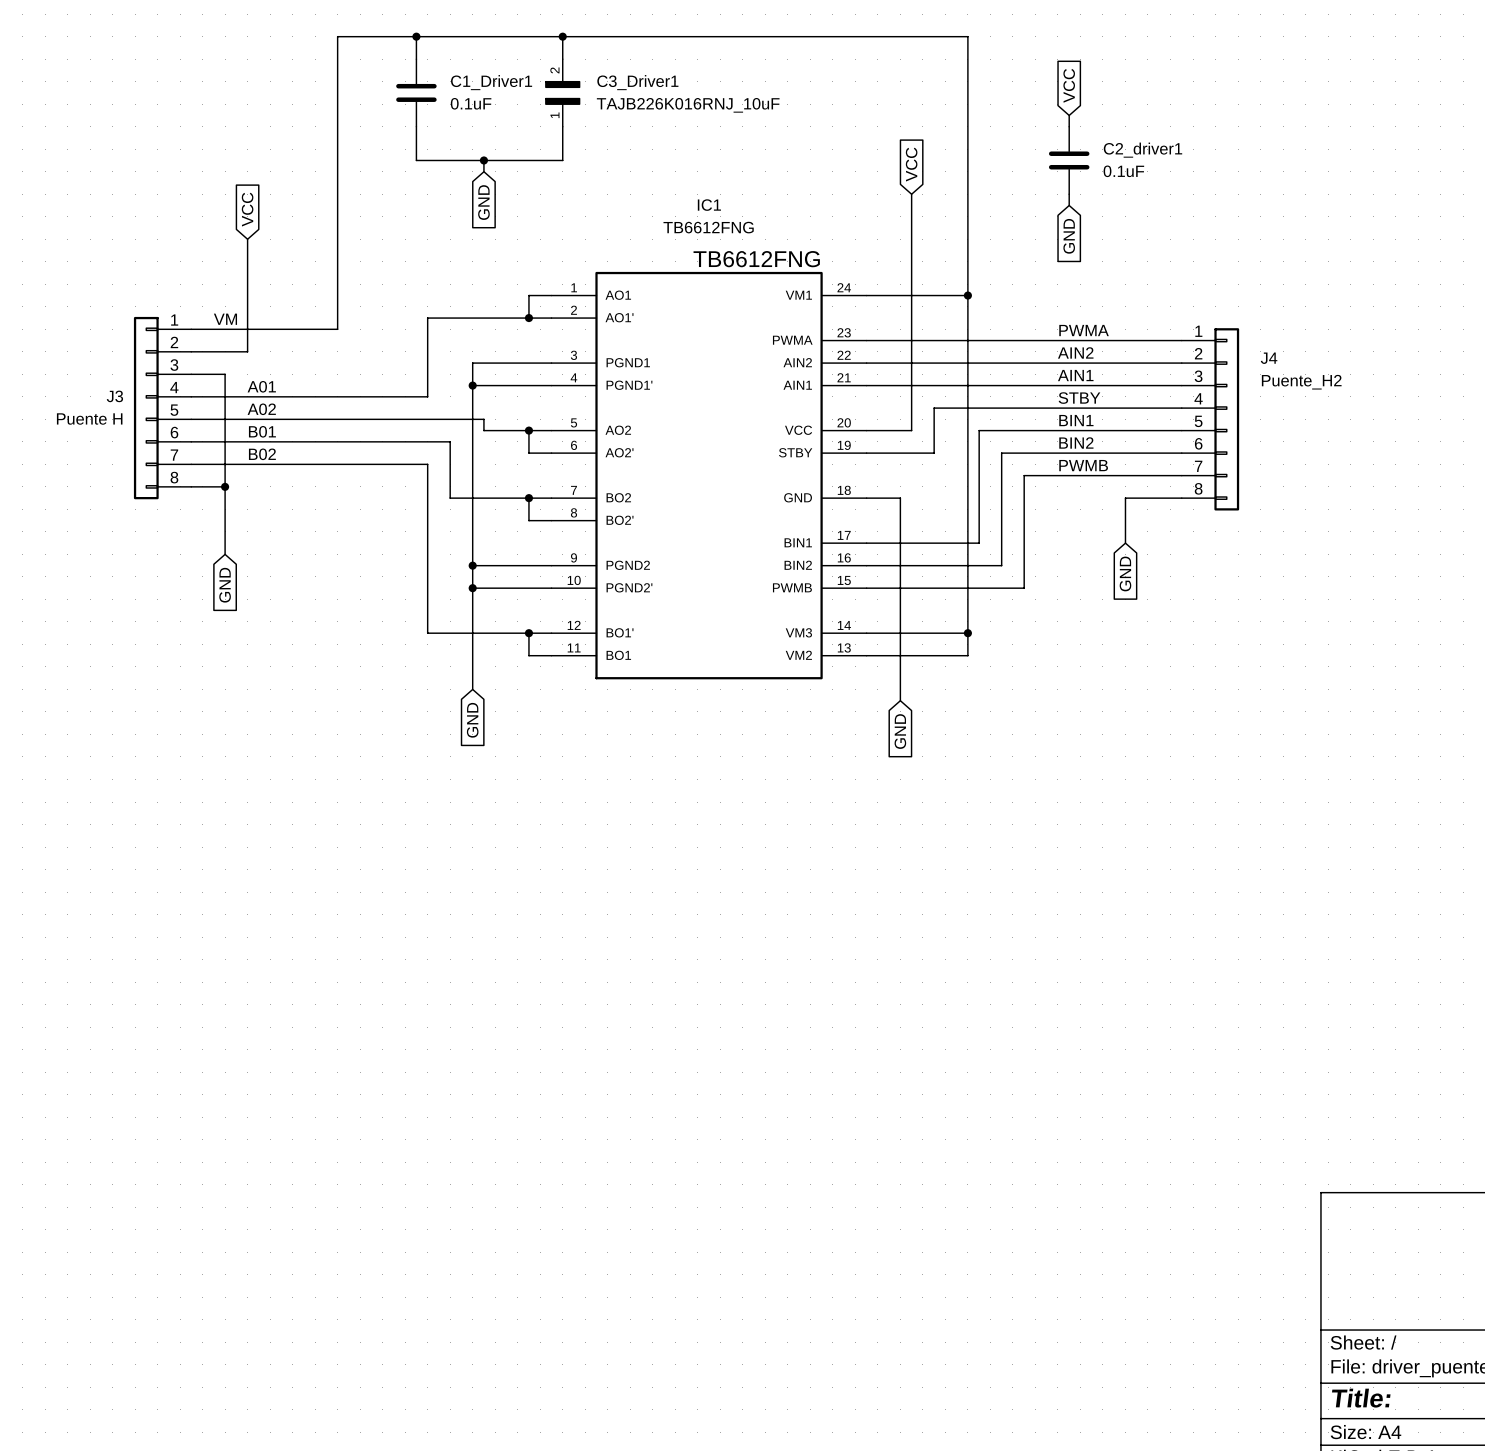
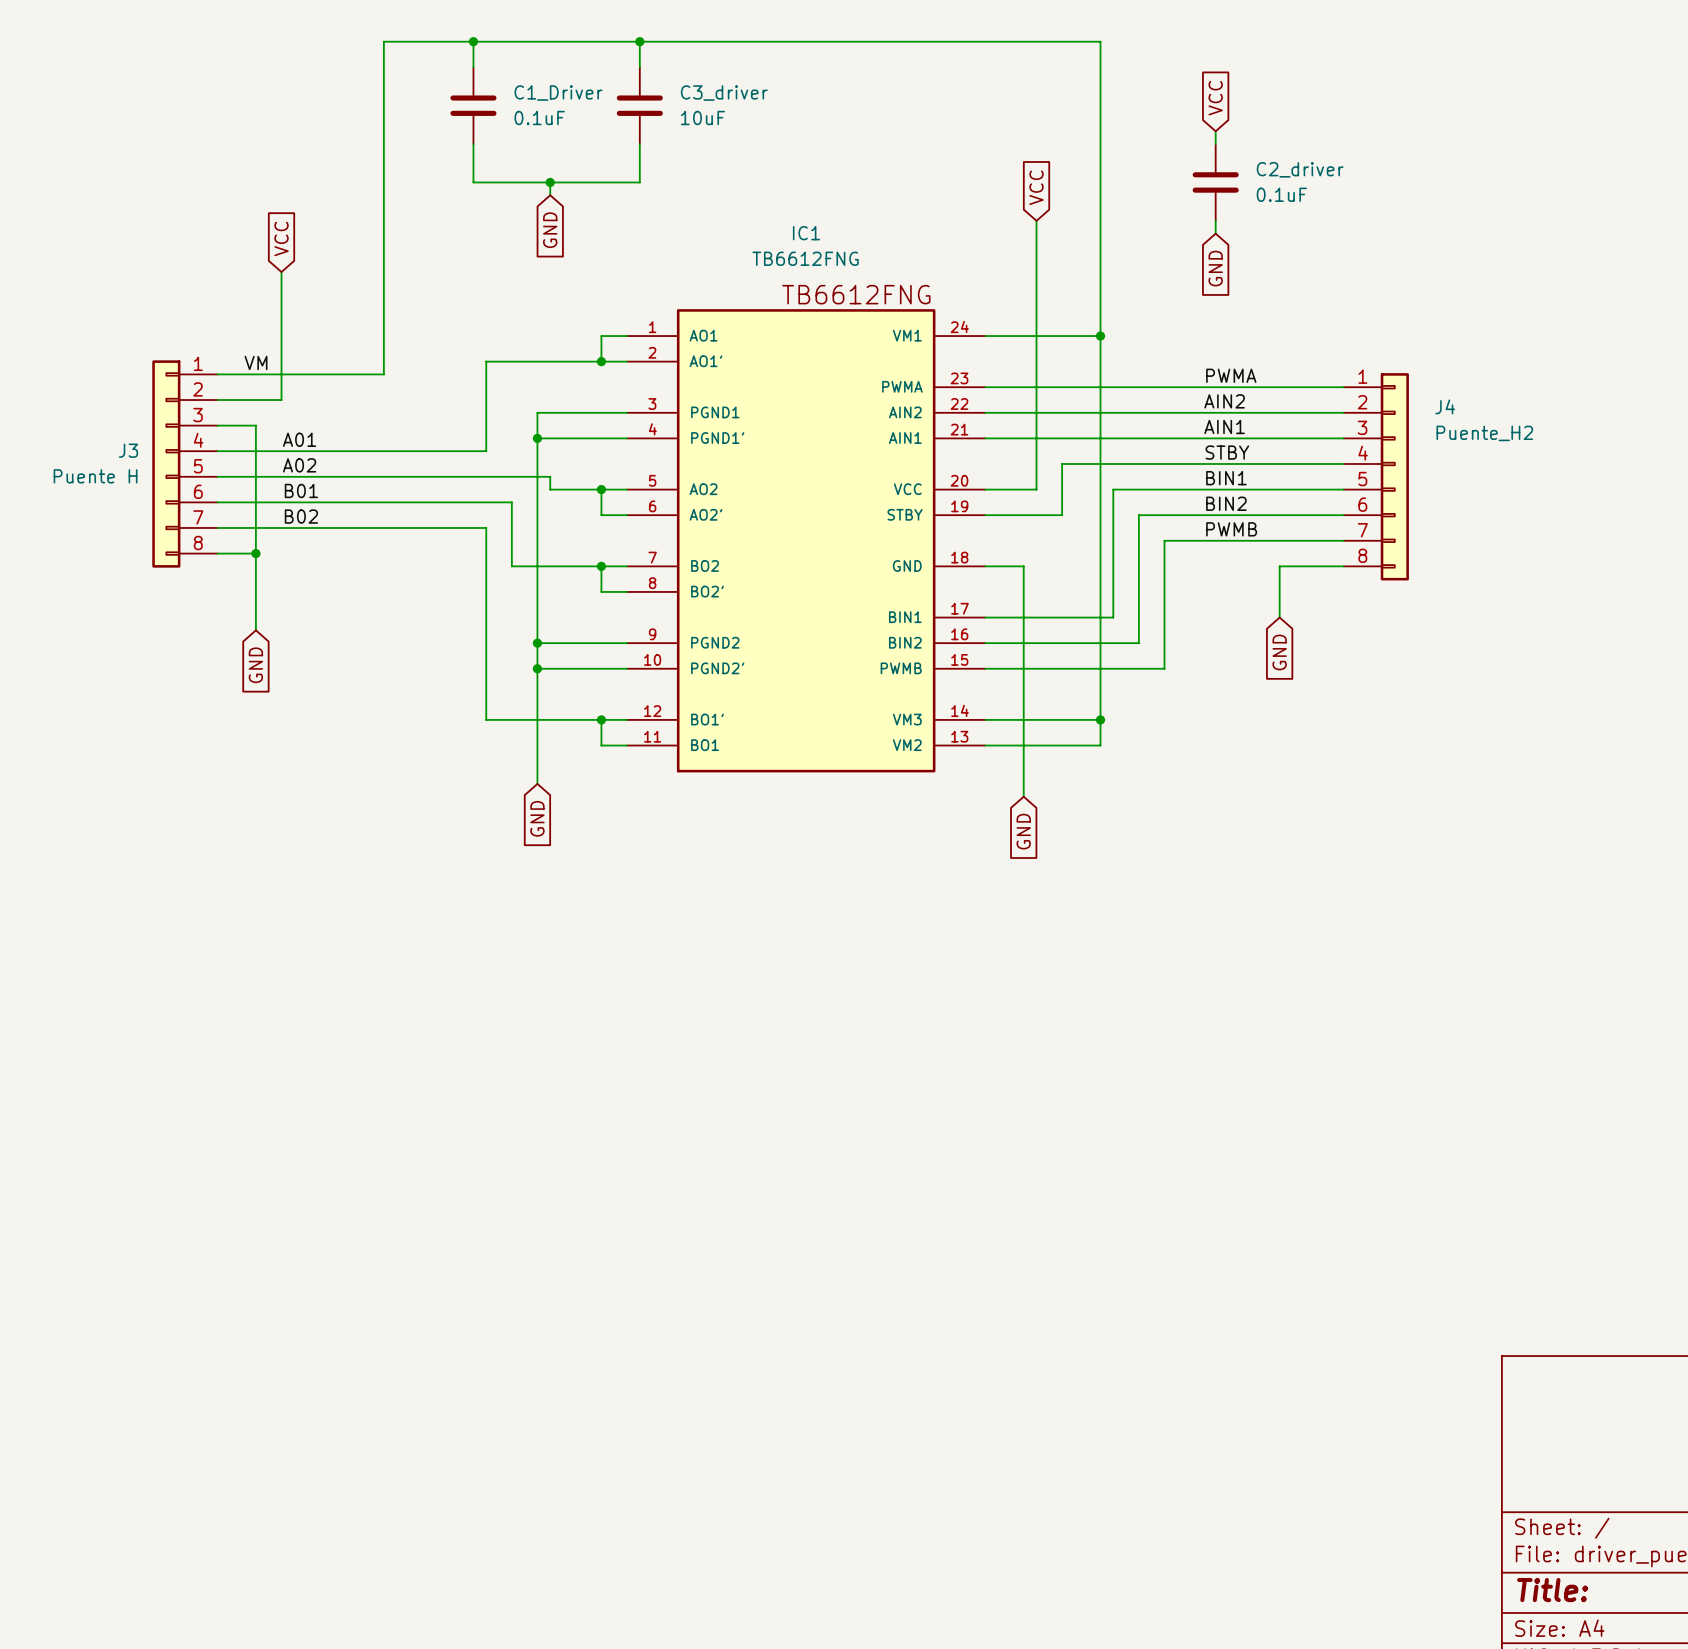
C1_Driver1 name: C1_Driver1 (491, 82) -> C1_Driver (558, 93)
C3_Driver1: TAJB226K016RNJ_10uF (562, 92) -> none
C3_driver: none -> 10uF (639, 105)
C2_driver1 name: C2_driver1 (1142, 150) -> C2_driver (1300, 169)

